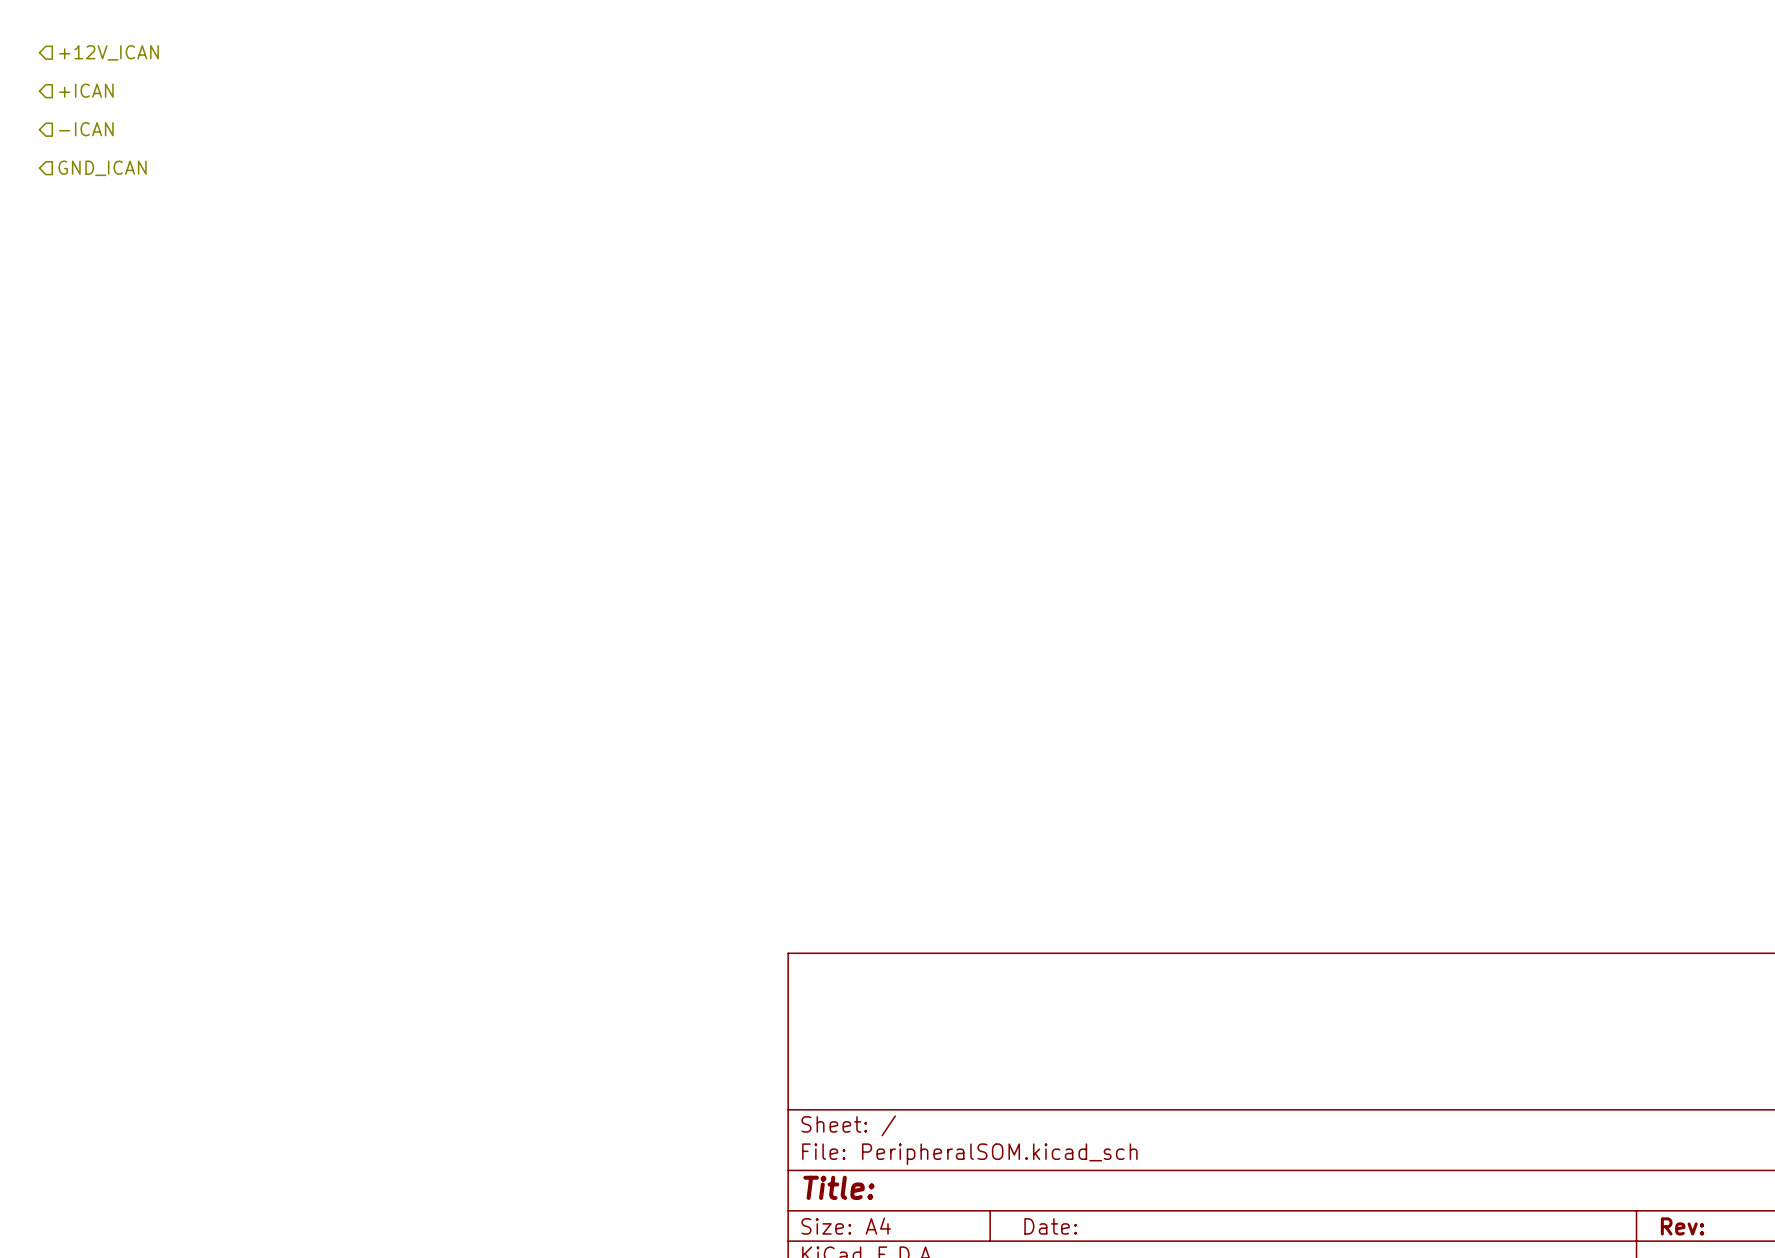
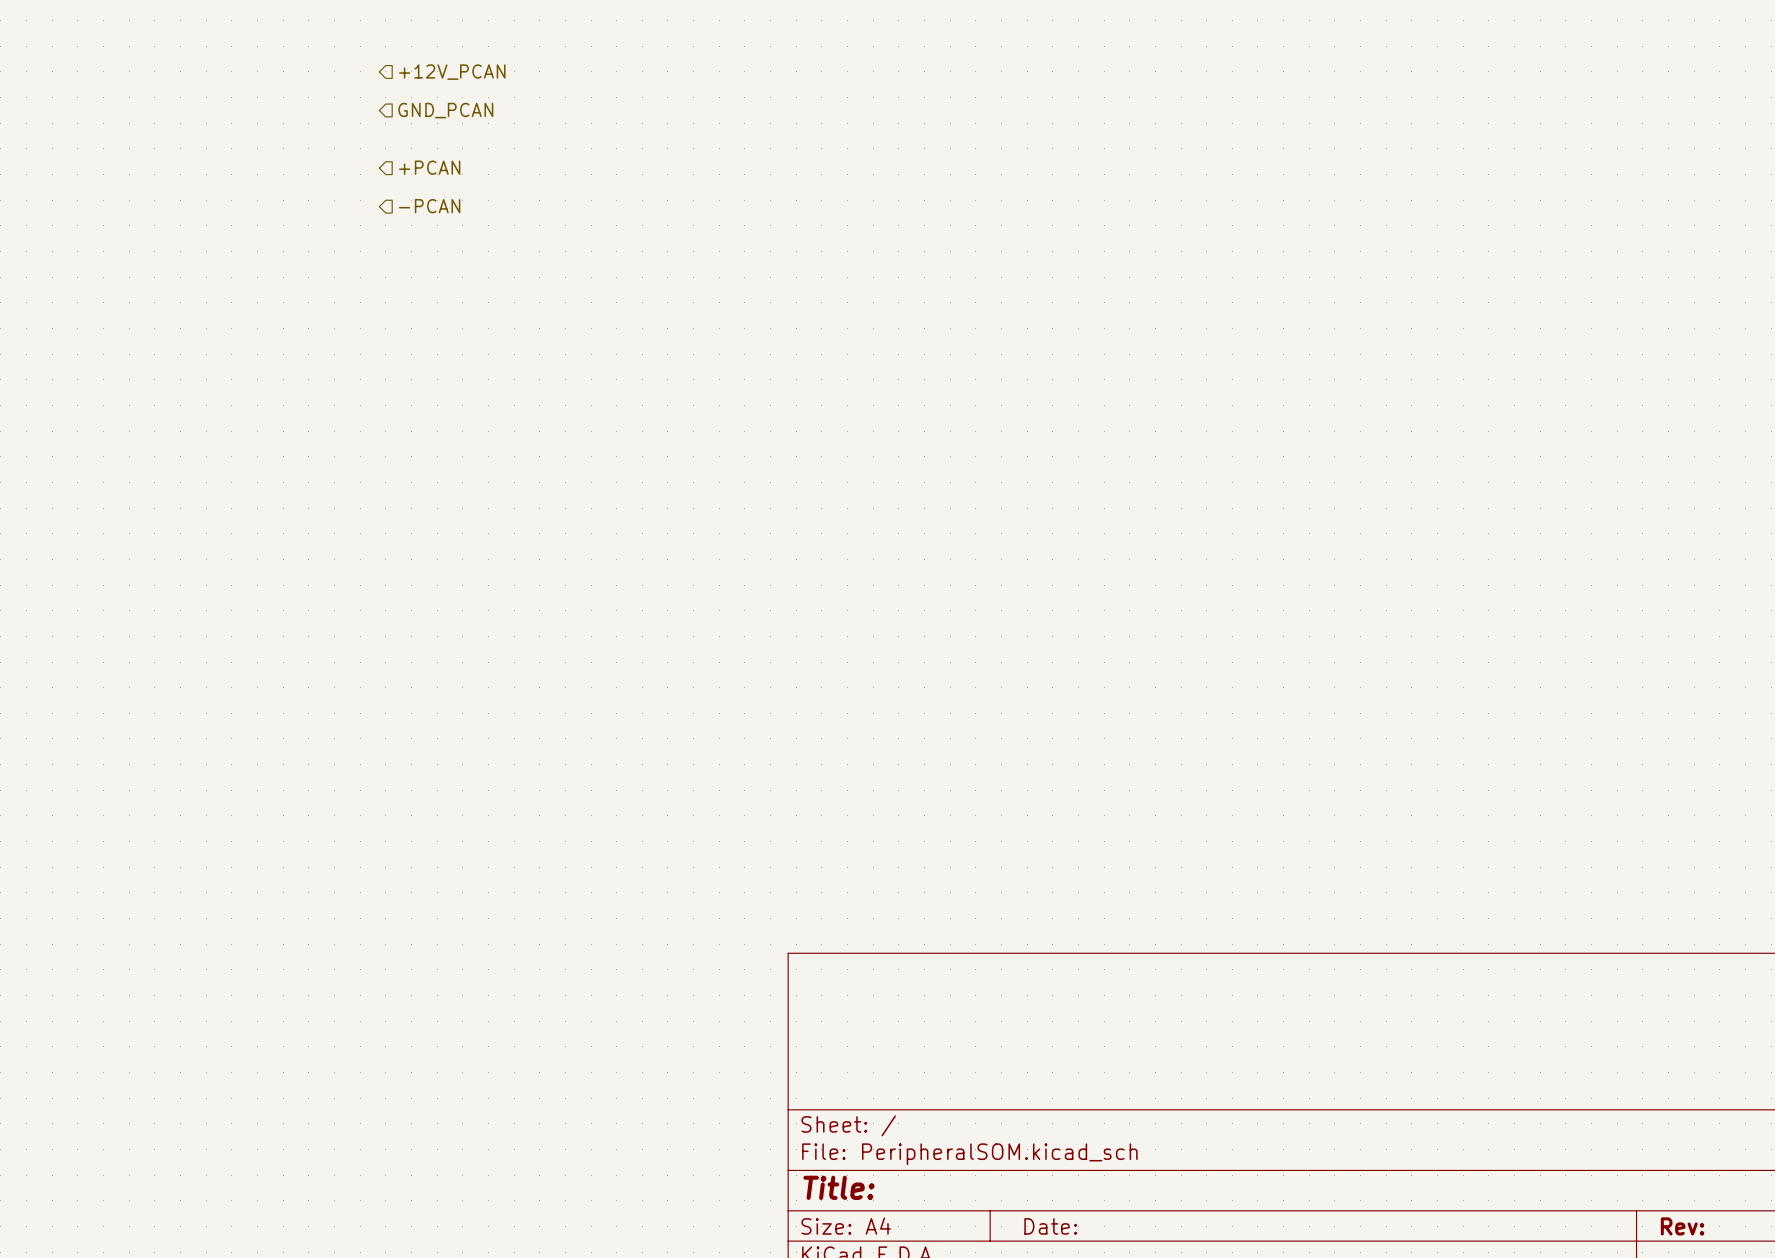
hierarchical label: +12V_ICAN (108, 52) -> none
hierarchical label: none -> +12V_PCAN (452, 72)
hierarchical label: +ICAN (86, 90) -> none
hierarchical label: none -> GND_PCAN (445, 110)
hierarchical label: -ICAN (86, 129) -> none
hierarchical label: none -> +PCAN (429, 167)
hierarchical label: GND_ICAN (102, 168) -> none
hierarchical label: none -> -PCAN (429, 206)

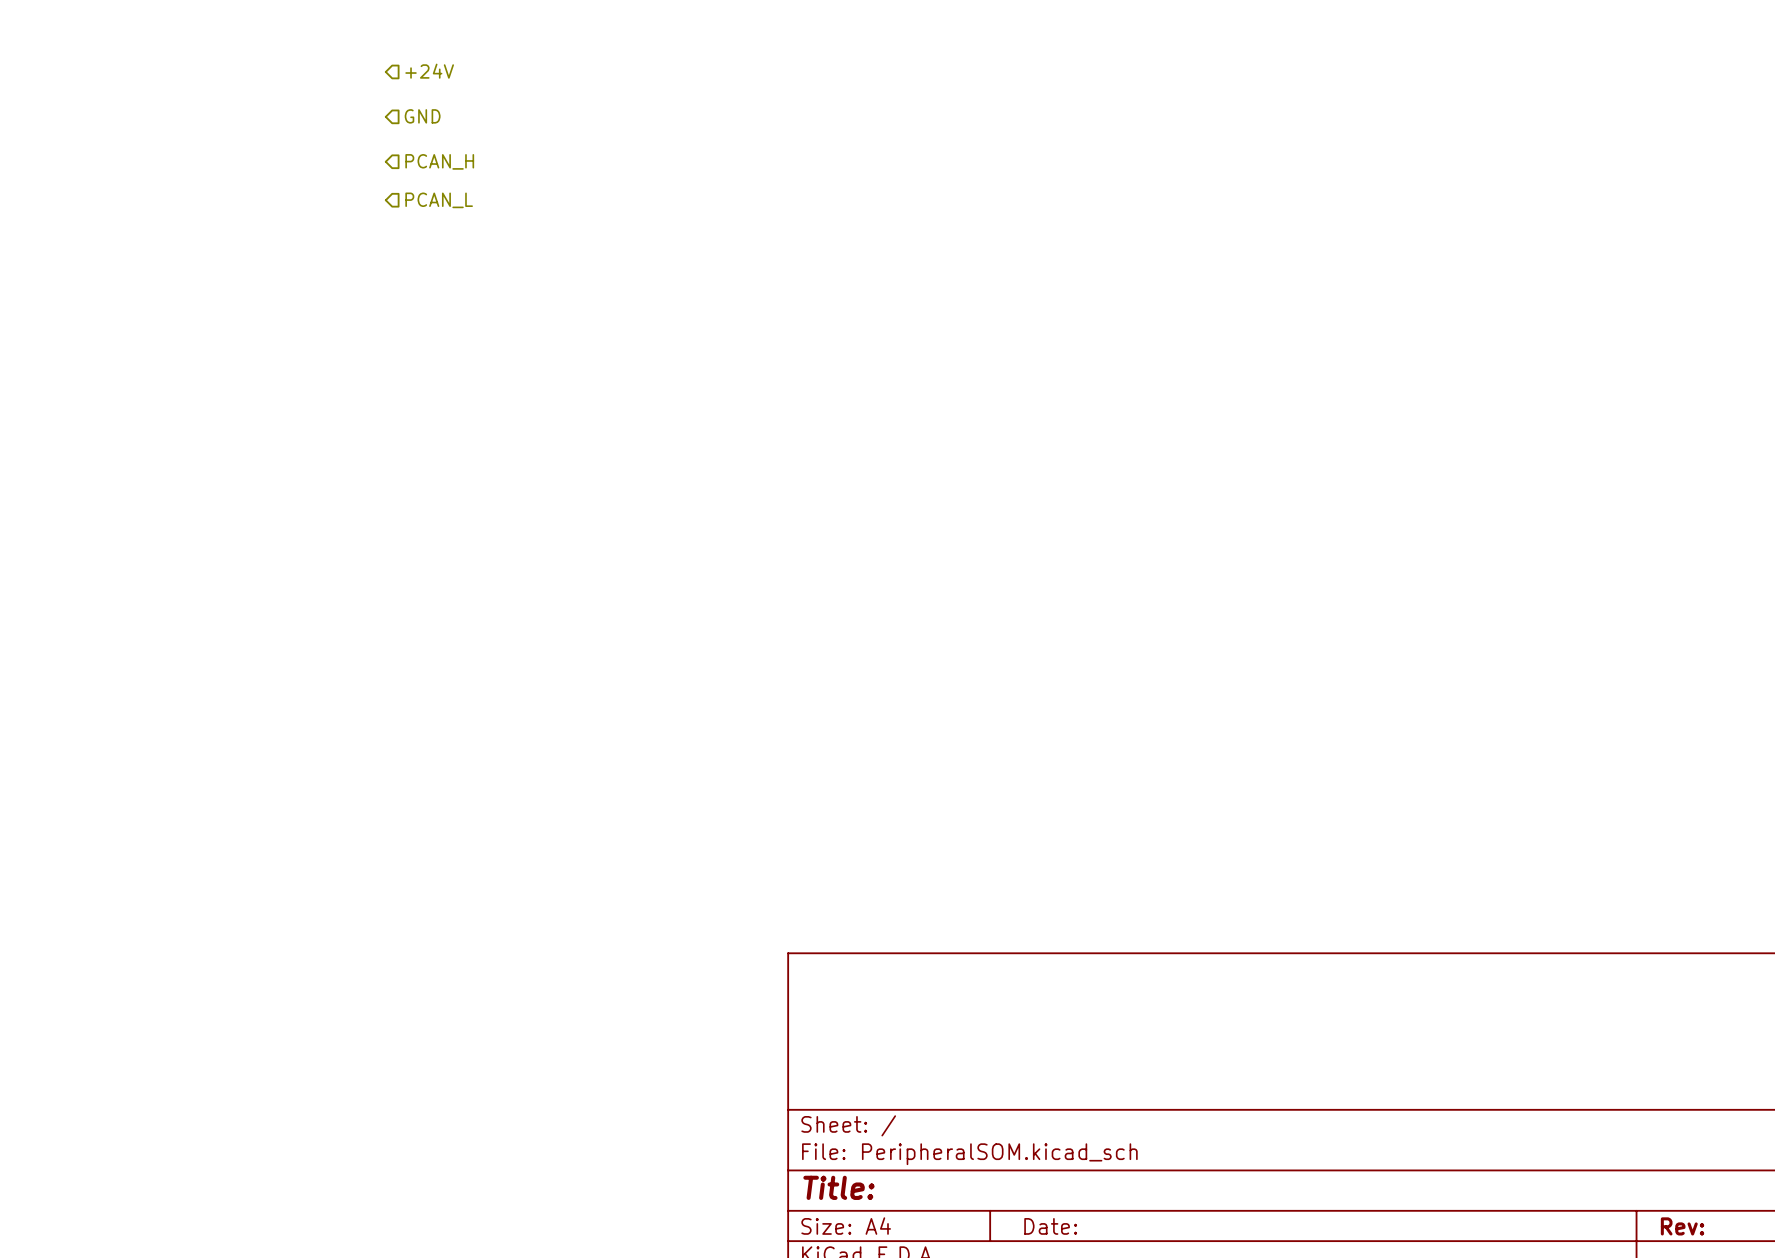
hierarchical label: +12V_PCAN (452, 72) -> +24V (429, 71)
hierarchical label: GND_PCAN (445, 110) -> GND (422, 116)
hierarchical label: +PCAN (429, 167) -> PCAN_H (439, 161)
hierarchical label: -PCAN (429, 206) -> PCAN_L (439, 200)

